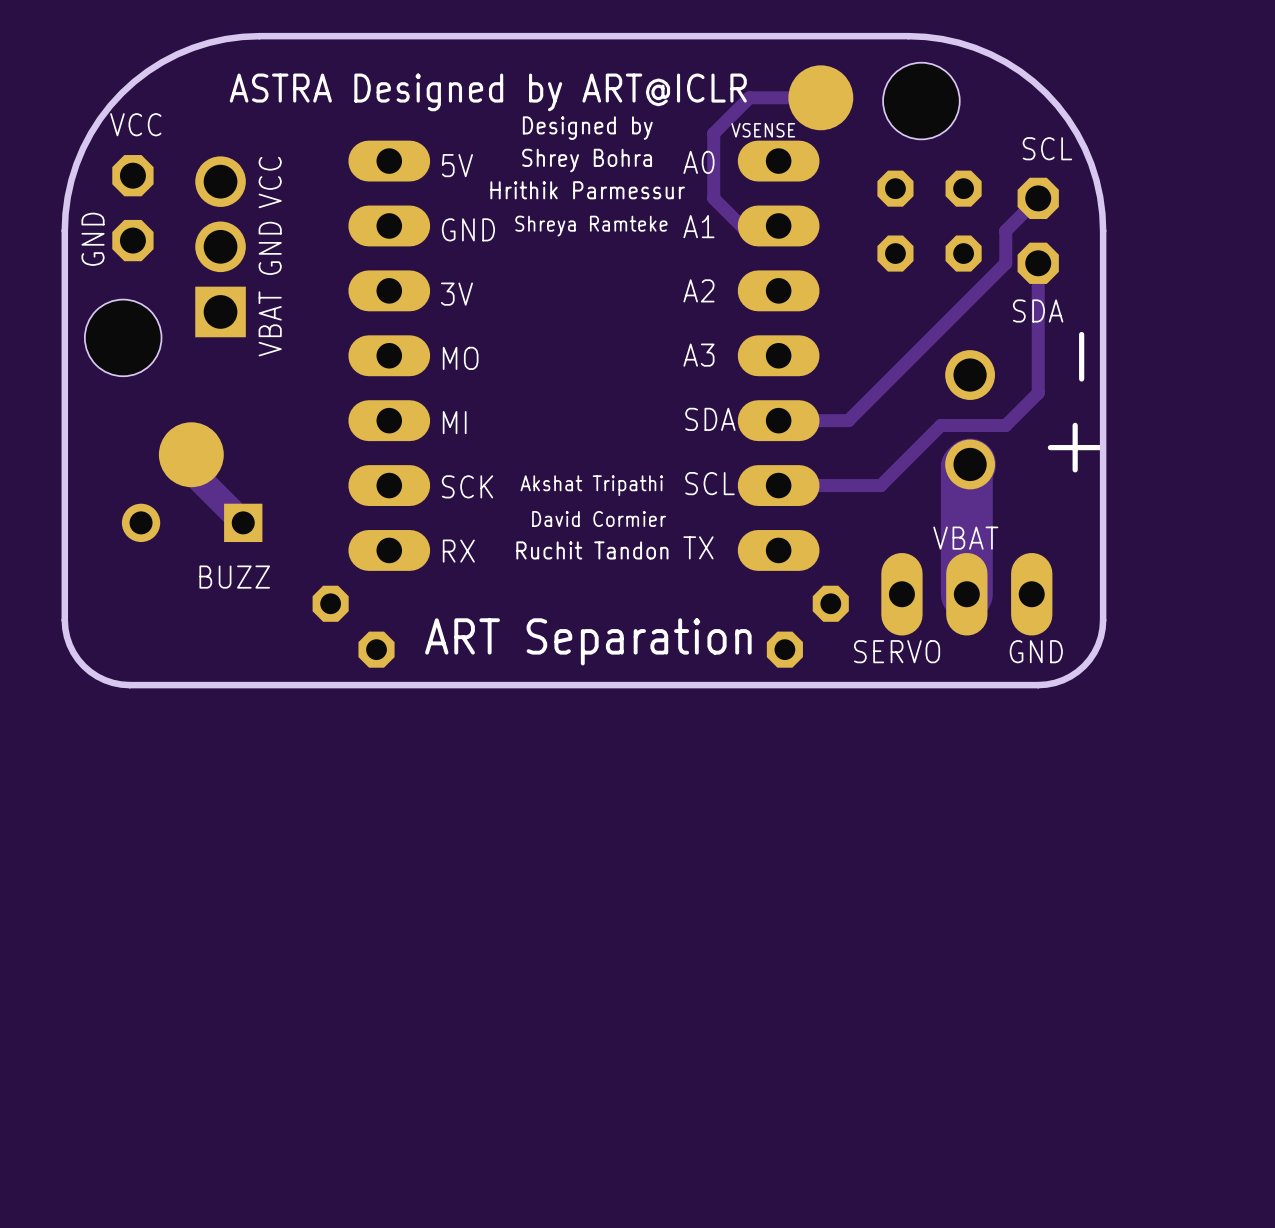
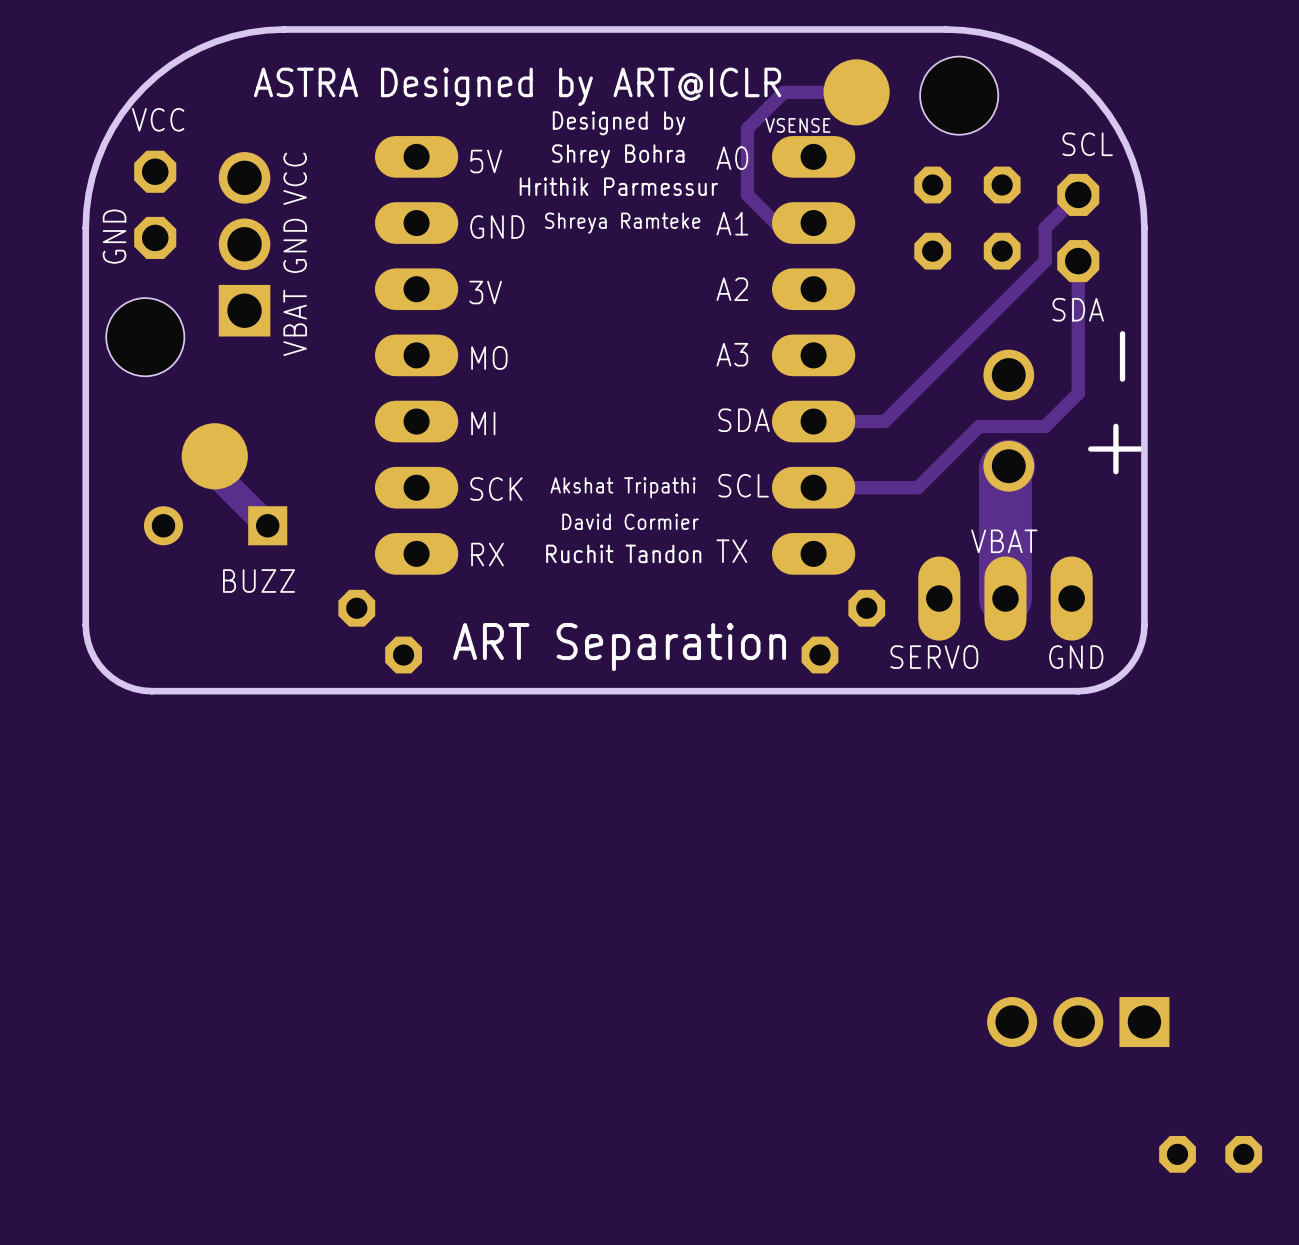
part: none -> (1078, 1022)
part: none -> (1210, 1154)

